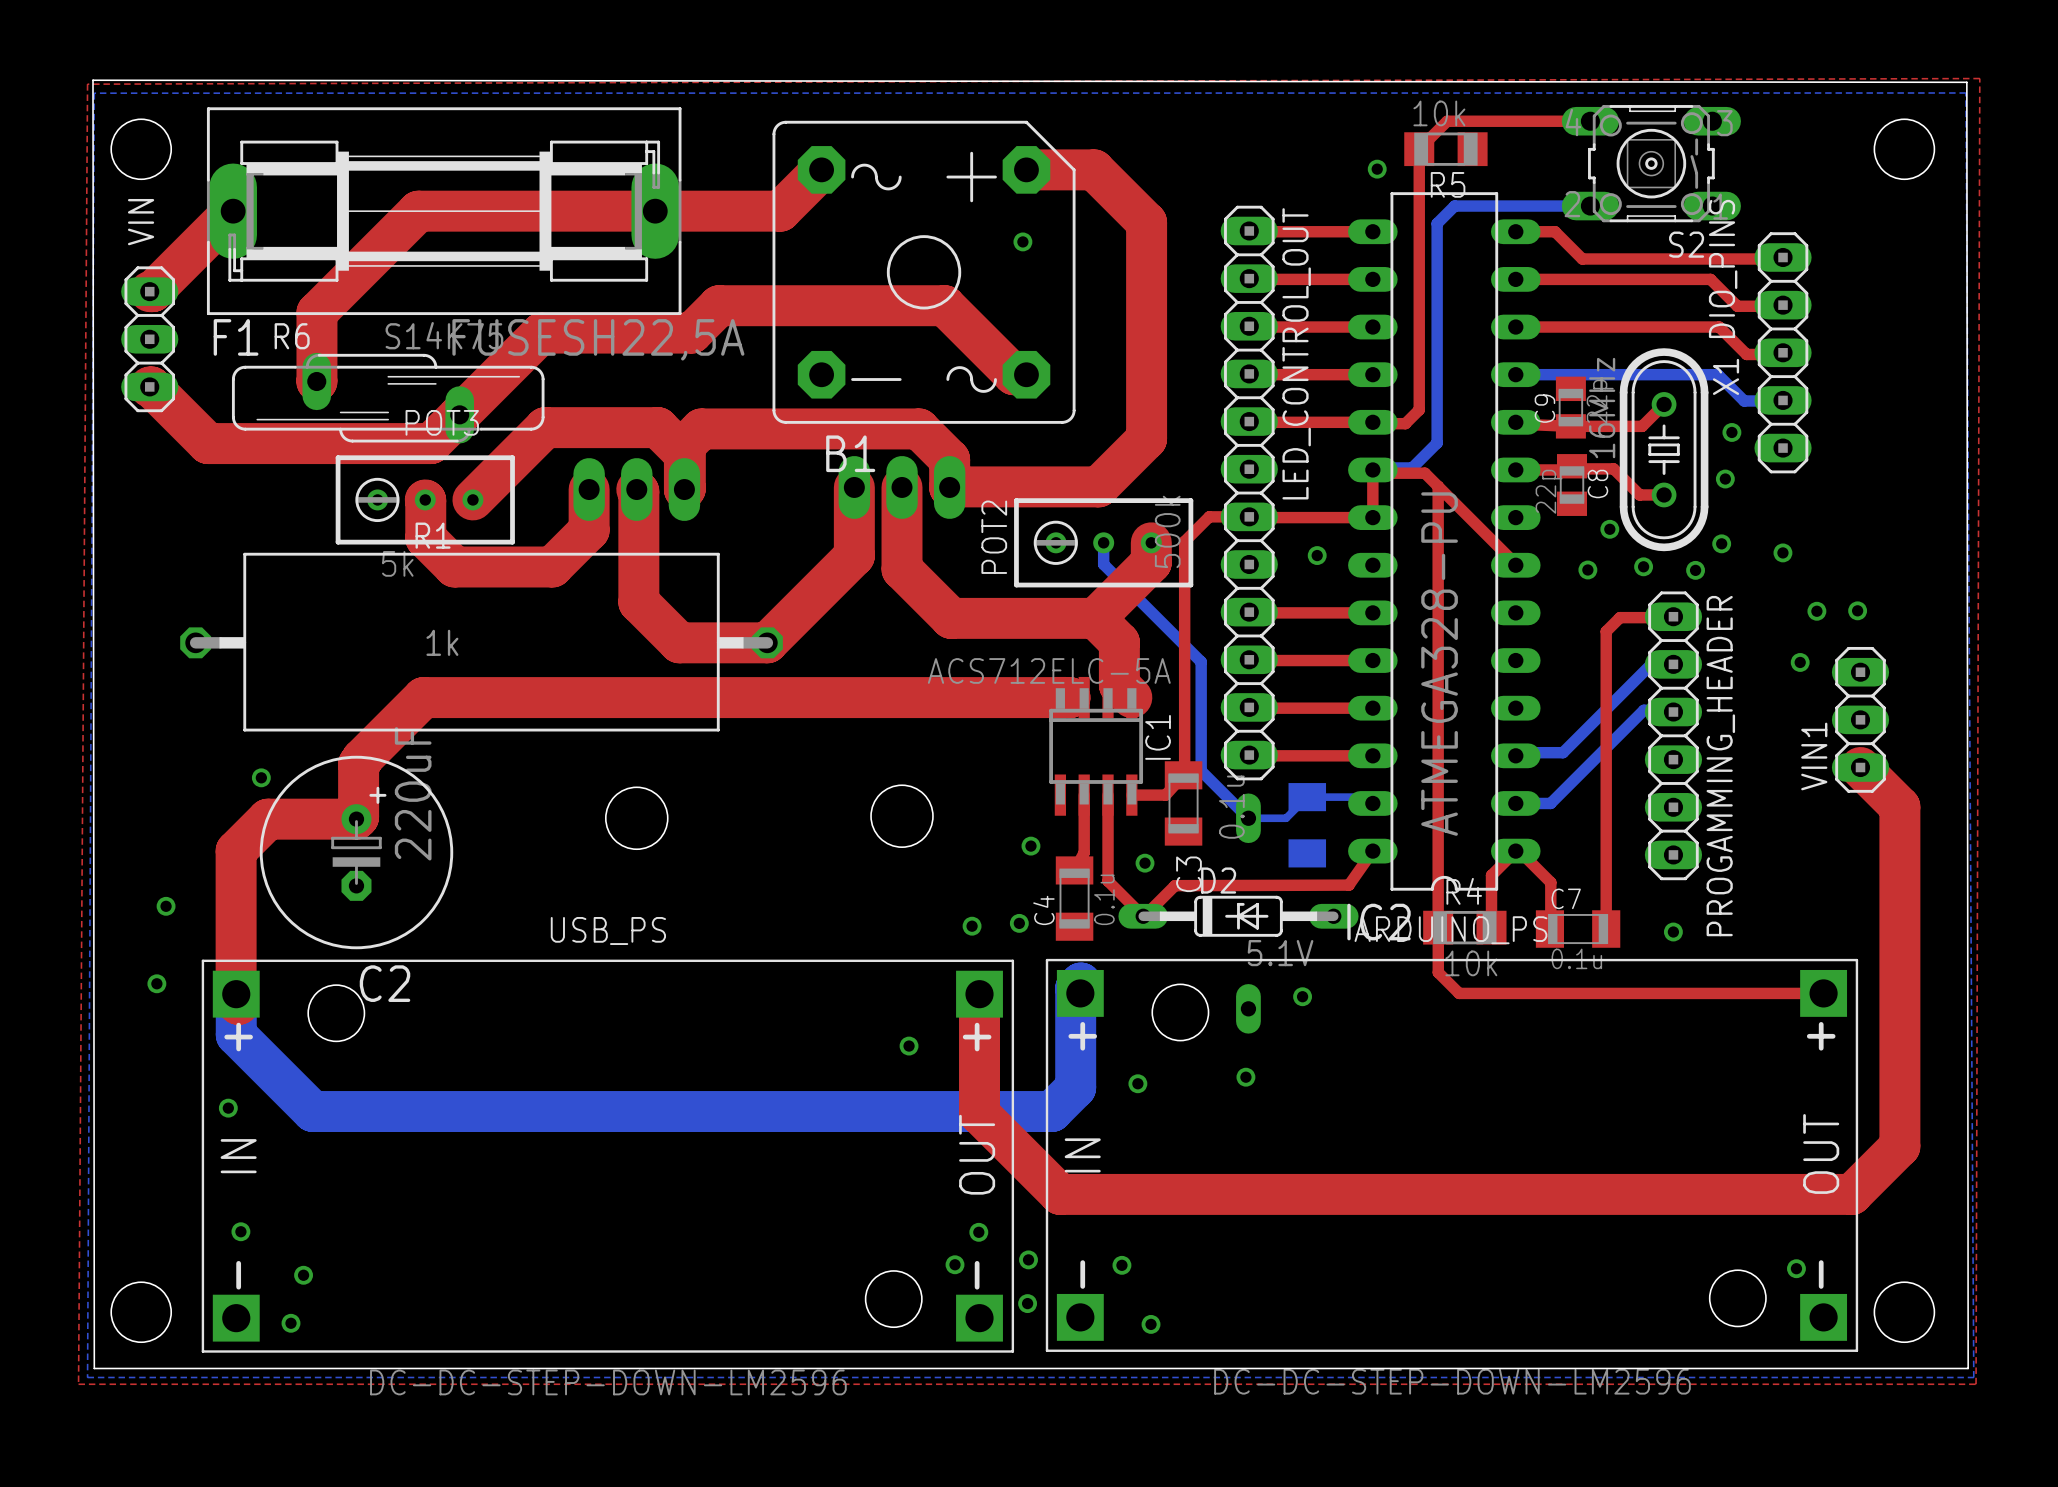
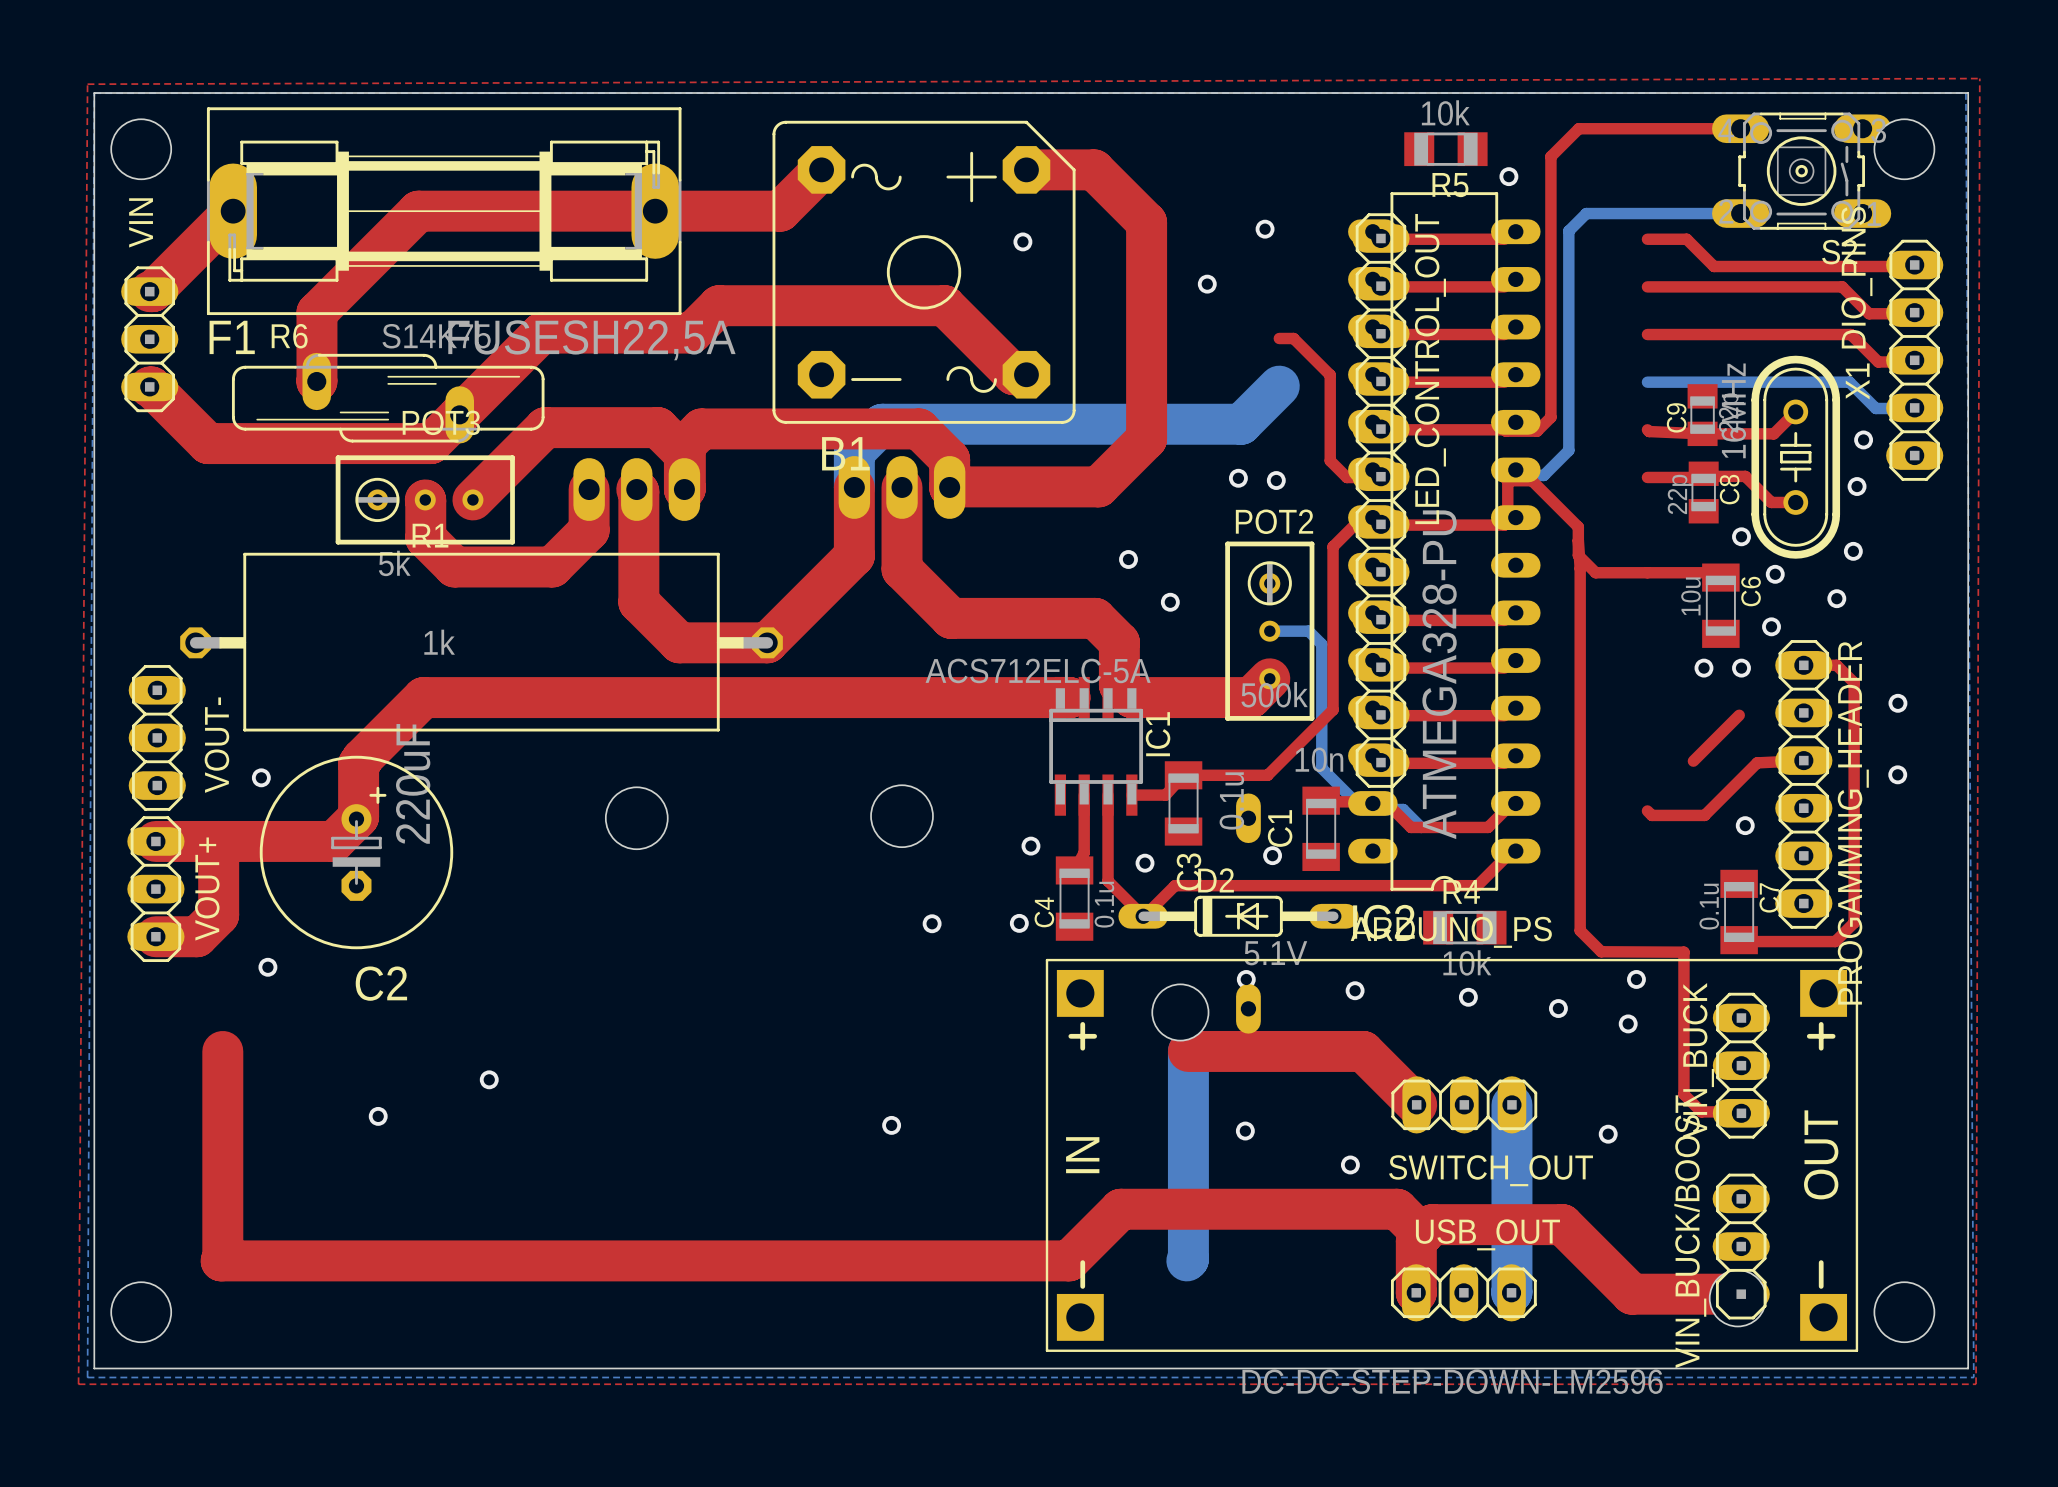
top track: (1590, 121) (1447, 121) (1419, 149) (1419, 409) (1405, 423) (1249, 421) -> none
top track: none -> (1740, 128) (1578, 128) (1550, 156) (1550, 417) (1537, 431) (1380, 429)
S2 position: (1651, 163) -> (1801, 171)
via: (1377, 169) -> none
via: none -> (1508, 176)
bottom track: (1590, 206) (1454, 206) (1437, 223) (1437, 443) (1412, 467) (1374, 467) (1372, 469) -> none
bottom track: none -> (1740, 213) (1586, 213) (1568, 231) (1568, 450) (1543, 475) (1506, 475) (1504, 477)
via: none -> (1265, 229)
top track: (1249, 230) (1372, 231) -> (1380, 238) (1504, 239)
top track: (1515, 231) (1555, 231) (1582, 259) (1783, 257) -> (1647, 239) (1686, 239) (1714, 266) (1914, 265)
top track: (1249, 278) (1372, 279) -> (1380, 286) (1504, 286)
top track: (1515, 279) (1710, 279) (1737, 306) (1783, 305) -> (1647, 286) (1842, 286) (1869, 313) (1914, 312)
via: none -> (1207, 284)
top track: (1249, 326) (1372, 327) -> (1380, 333) (1504, 334)
top track: (1515, 327) (1719, 327) (1746, 354) (1781, 354) (1783, 352) -> (1647, 334) (1850, 334) (1878, 361) (1913, 361) (1914, 360)
top track: none -> (1279, 338) (1293, 338) (1330, 375) (1330, 460) (1346, 477) (1380, 476)
DIO_PINS position: (1783, 352) -> (1914, 360)
top track: (1249, 373) (1372, 374) -> (1380, 381) (1504, 382)
bottom track: (1515, 374) (1717, 374) (1744, 400) (1783, 400) -> (1647, 382) (1849, 382) (1875, 408) (1914, 407)
bottom track: none -> (1279, 386) (1241, 424) (882, 424) (854, 452) (854, 487)
top track: (1664, 404) (1642, 426) (1570, 426) (1517, 424) (1515, 422) -> (1795, 411) (1773, 433) (1702, 433) (1649, 431) (1647, 429)
C9 position: (1570, 407) -> (1702, 415)
via: (1731, 432) -> none
via: none -> (1863, 439)
X1 position: (1664, 449) -> (1795, 457)
top track: (1515, 469) (1568, 469) (1572, 466) (1574, 468) (1613, 468) (1639, 494) (1664, 494) -> (1647, 477) (1699, 477) (1703, 473) (1706, 476) (1745, 476) (1771, 502) (1795, 502)
via: none -> (1238, 478)
via: (1725, 479) -> none
via: none -> (1276, 480)
top track: none -> (1507, 480) (1532, 480) (1578, 527) (1578, 555) (1595, 572) (1713, 572) (1720, 577)
C8 position: (1572, 485) -> (1703, 492)
top track: (1438, 486) (1438, 927) -> none
via: none -> (1857, 486)
LED_CONTROL_OUT position: (1249, 493) -> (1380, 500)
via: (1609, 529) -> none
top track: none -> (1578, 540) (1580, 568) (1580, 930) (1601, 951) (1683, 952) (1683, 1094) (1701, 1111) (1741, 1113)
bottom track: (1103, 542) (1103, 564) (1201, 661) (1201, 770) (1248, 818) (1286, 818) (1307, 797) (1366, 797) (1372, 803) -> none
POT2 rotation: 0° (1103, 542) -> 90° clockwise (1269, 631)
POT2 position: (1103, 542) -> (1269, 631)
top track: (1151, 542) (1151, 562) (1095, 618) -> none
via position: (1721, 543) -> (1741, 536)
via: none -> (1853, 551)
via: (1782, 552) -> none
via: (1317, 555) -> none
via: none -> (1128, 559)
top track: (1515, 565) (1424, 473) (1376, 473) (1372, 469) (1372, 517) (1209, 516) (1184, 541) (1183, 775) -> (1507, 480) (1507, 521) (1504, 525) (1355, 524) (1333, 546) (1333, 709) (1267, 775) (1183, 775)
via: (1643, 566) -> none
via: (1587, 569) -> none
via: (1695, 570) -> none
via: none -> (1775, 574)
via: none -> (1836, 598)
via: none -> (1170, 602)
C6: none -> 10u (1720, 605)
via: (1857, 610) -> none
via: (1816, 611) -> none
top track: (1249, 612) (1372, 612) -> (1380, 619) (1504, 620)
top track: (1673, 616) (1620, 617) (1606, 631) (1606, 929) -> none
via: none -> (1771, 626)
bottom track: none -> (1269, 631) (1308, 631) (1321, 644) (1321, 768) (1363, 809) (1403, 809) (1421, 827)
top track: (1249, 659) (1372, 660) -> (1380, 667) (1504, 668)
via: (1800, 662) -> none
bottom track: (1673, 664) (1651, 664) (1563, 752) (1518, 752) (1515, 755) -> none
top track: none -> (1803, 665) (1836, 665) (1854, 682) (1854, 922) (1835, 941) (1739, 940)
via: none -> (1703, 668)
via: none -> (1741, 668)
top track: none -> (1269, 678) (1251, 697) (1131, 697)
via: none -> (1897, 703)
top track: (1249, 707) (1372, 708) -> (1380, 714) (1504, 715)
bottom track: (1673, 712) (1671, 710) (1643, 710) (1550, 803) (1515, 803) -> none
top track: none -> (1739, 715) (1693, 761)
VIN1: (1860, 719) -> none
PROGAMMING_HEADER position: (1673, 735) -> (1803, 784)
VOUT-: none -> (157, 737)
top track: (1249, 755) (1372, 755) -> (1380, 762) (1504, 763)
top track: none -> (1803, 760) (1757, 762) (1704, 815) (1651, 815) (1647, 810)
top track: (1860, 767) (1899, 806) (1899, 1146) (1851, 1194) (1060, 1194) (979, 1113) (979, 994) -> none
via: none -> (1897, 774)
top track: none -> (1321, 800) (1385, 801) (1410, 827) (1488, 827) (1504, 810)
top track: (356, 819) (267, 819) (236, 850) (236, 1001) (238, 1004) (238, 996) (236, 994) -> (356, 819) (334, 841) (155, 841)
C1 side: bottom (1307, 825) -> top (1321, 828)
via: none -> (1745, 825)
top track: none -> (218, 841) (218, 915) (197, 936) (155, 936)
top track: (1372, 851) (1348, 885) (1175, 885) -> (1504, 858) (1477, 885) (1175, 885)
via: none -> (1272, 855)
VOUT+: none -> (155, 889)
via: (166, 906) -> none
via position: (972, 926) -> (932, 923)
top track: (1438, 927) (1438, 972) (1459, 993) (1823, 993) -> none
top track: (1491, 927) (1491, 875) (1515, 851) (1519, 851) (1550, 882) (1549, 929) -> none
C7 rotation: 0° (1578, 929) -> 90° clockwise (1739, 912)
C7 position: (1578, 929) -> (1739, 912)
via: (1673, 932) -> none
via: none -> (267, 967)
via: none -> (1246, 979)
via: none -> (1636, 979)
via: (156, 983) -> none
via: none -> (1355, 990)
bottom track: (1080, 993) (1080, 983) (1075, 988) (1075, 1087) (1051, 1111) (312, 1111) (236, 1034) (236, 994) -> none
via: (1302, 996) -> none
via: none -> (1468, 997)
via: none -> (1558, 1008)
via: none -> (1628, 1023)
via: (909, 1046) -> none
top track: none -> (222, 1051) (222, 1259) (221, 1260) (1069, 1260) (1120, 1209) (1397, 1209) (1422, 1234)
bottom track: none -> (1188, 1051) (1188, 1259) (1186, 1260)
top track: none -> (1188, 1051) (1363, 1051) (1416, 1104)
VIN_BUCK: none -> (1741, 1065)
via: (1245, 1077) -> none
via: none -> (489, 1079)
via: (1137, 1083) -> none
SWITCH_OUT: none -> (1464, 1104)
bottom track: none -> (1511, 1104) (1511, 1292)
via: (228, 1108) -> none
via: none -> (378, 1116)
via: none -> (891, 1125)
via: none -> (1245, 1131)
via: none -> (1608, 1134)
USB_PS: DC-DC-STEP-DOWN-LM2596 (607, 1156) -> none
via: none -> (1350, 1164)
via: (240, 1231) -> none
via: (978, 1232) -> none
VIN_BUCK/BOOST: none -> (1741, 1246)
via: (1028, 1259) -> none
via: (955, 1264) -> none
via: (1121, 1265) -> none
via: (1796, 1268) -> none
via: (303, 1275) -> none
top track: none -> (1416, 1292) (1416, 1240) (1432, 1224) (1562, 1224) (1632, 1294) (1741, 1294)
USB_OUT: none -> (1463, 1292)
via: (1027, 1303) -> none
via: (290, 1323) -> none
via: (1151, 1324) -> none
board edge: (94, 1368) (93, 80) (1966, 82) (1968, 1368) -> (94, 1368) (94, 93) (1968, 93) (1968, 1368)

